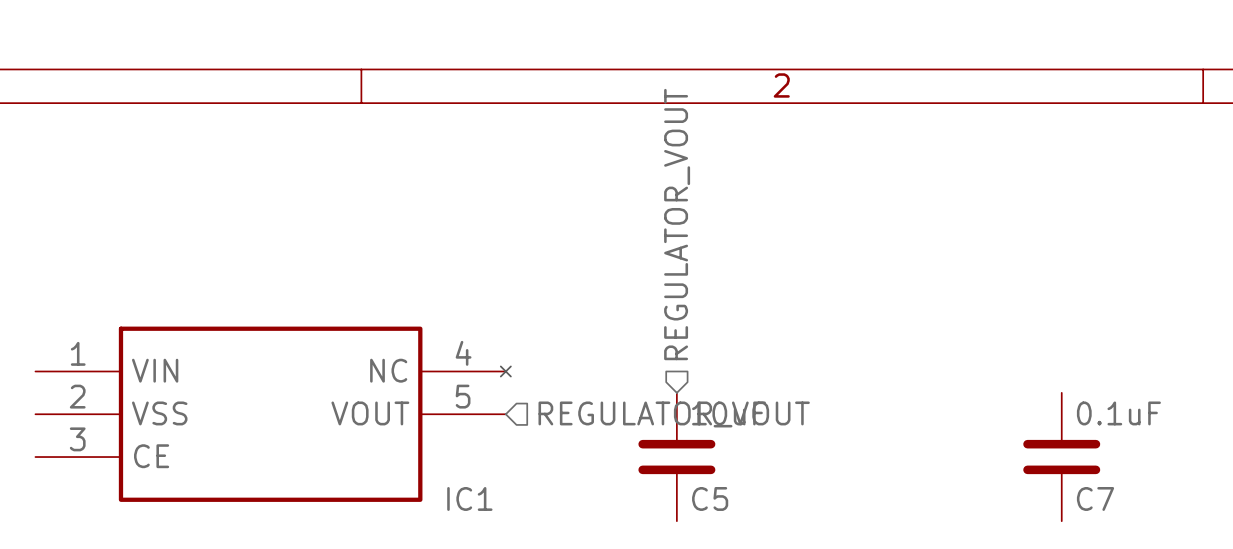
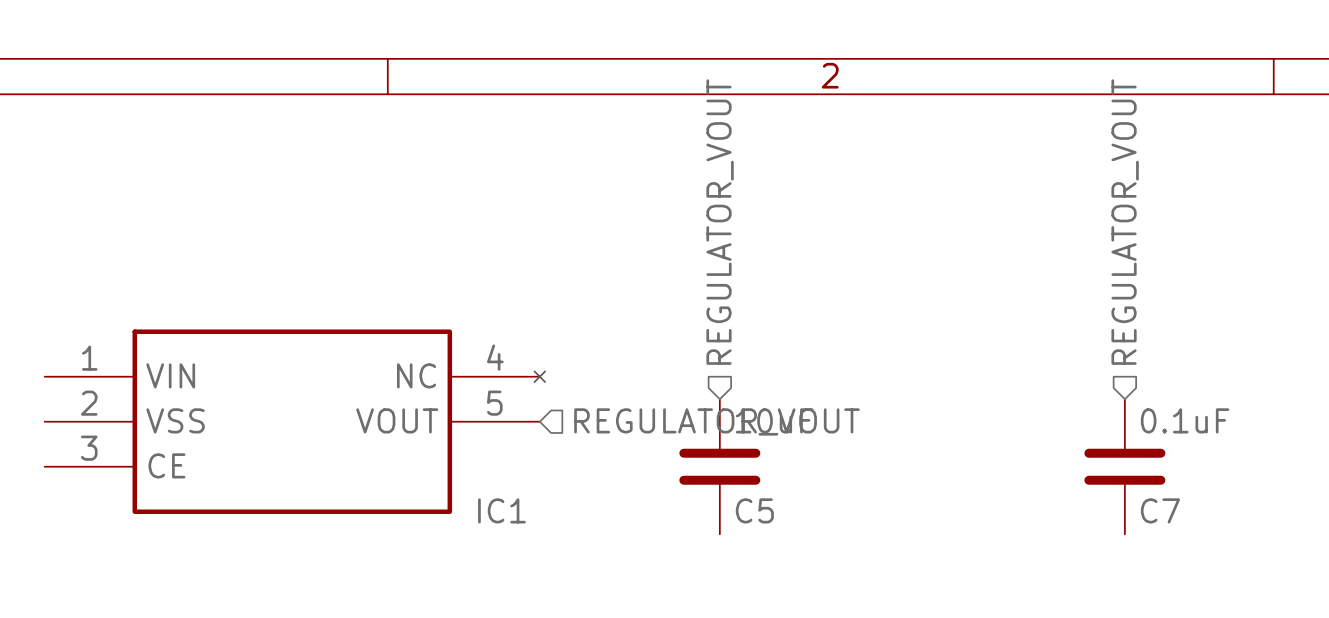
hierarchical label: none -> REGULATOR_VOUT (1125, 222)

